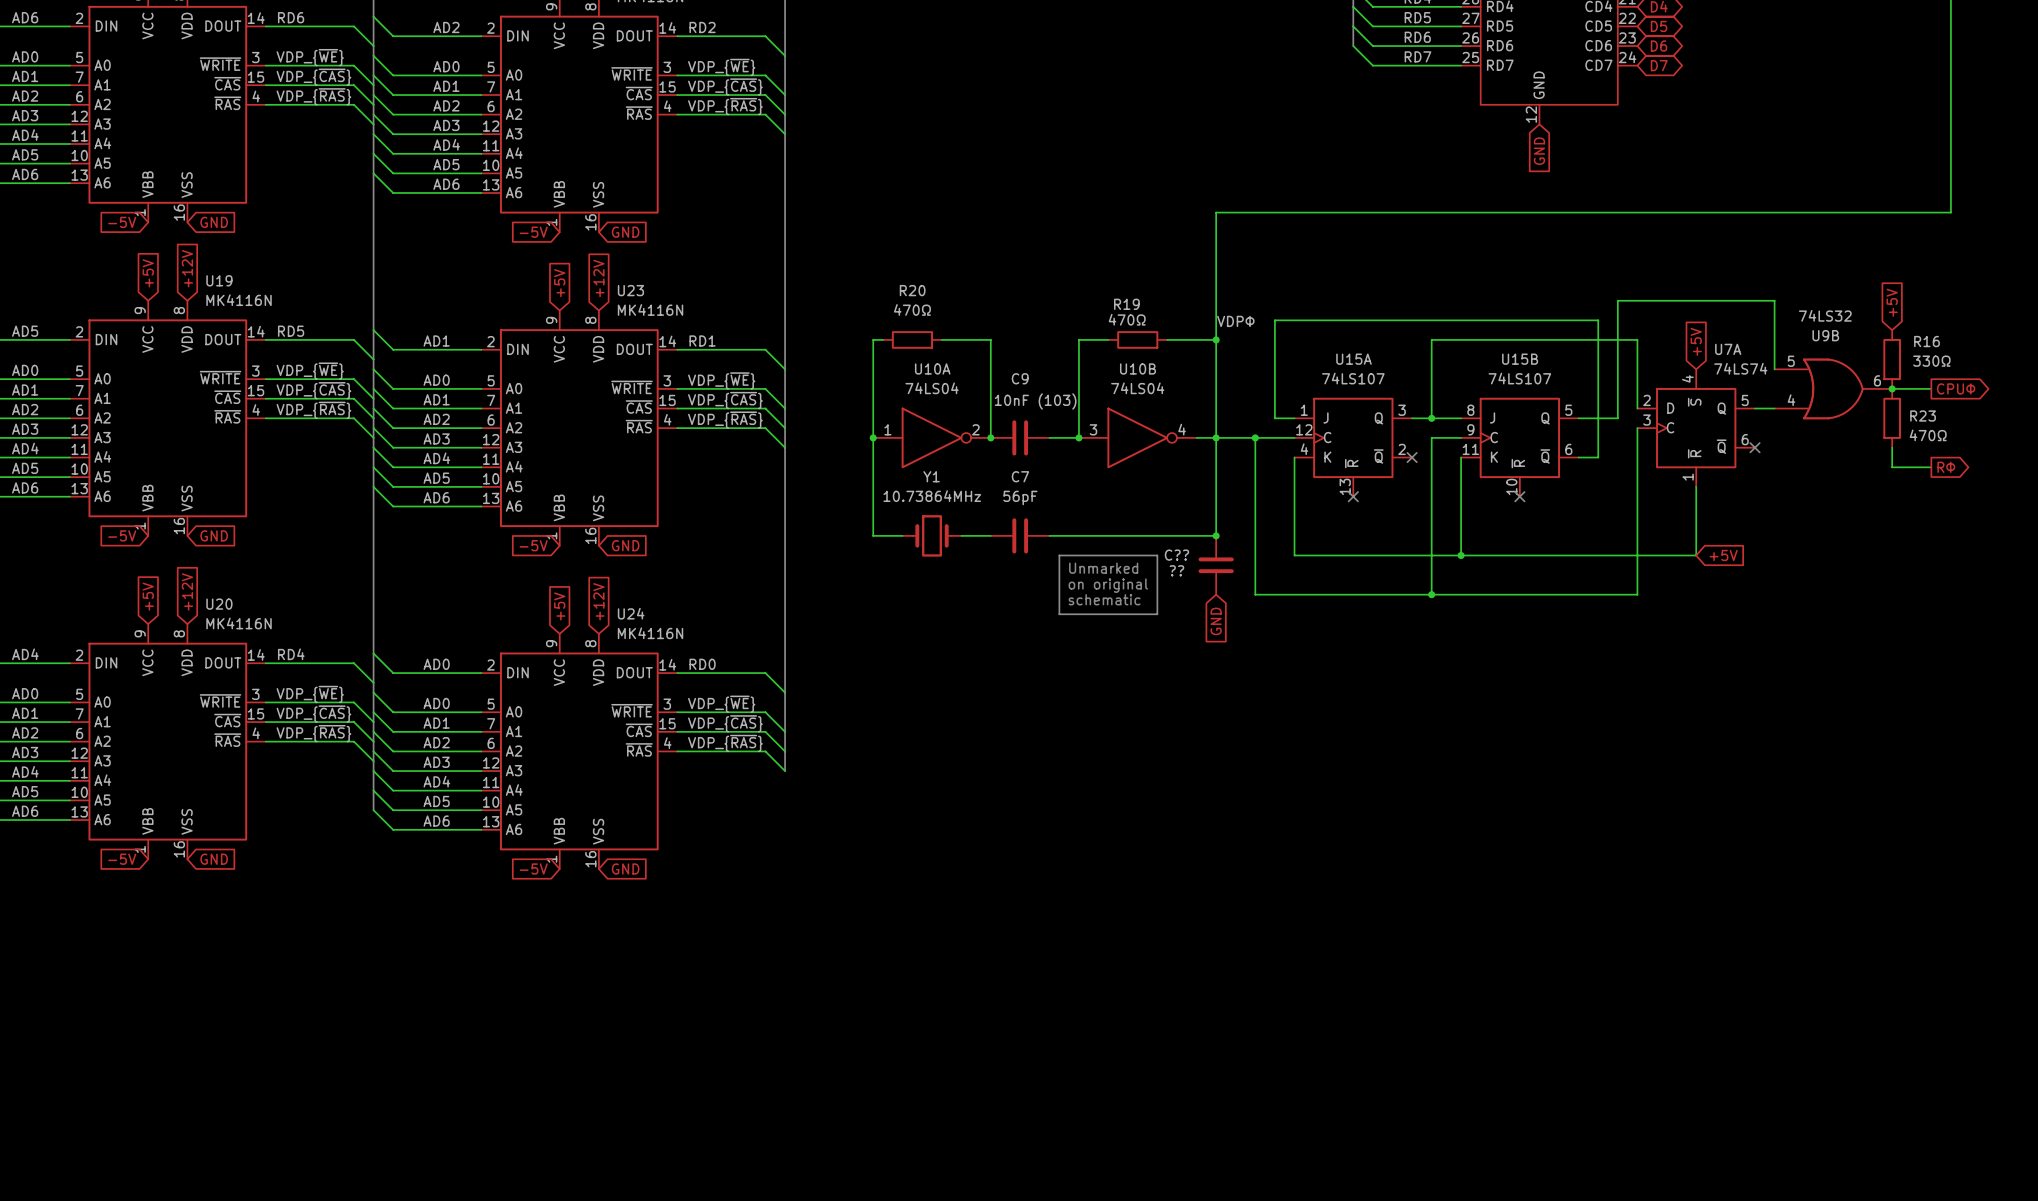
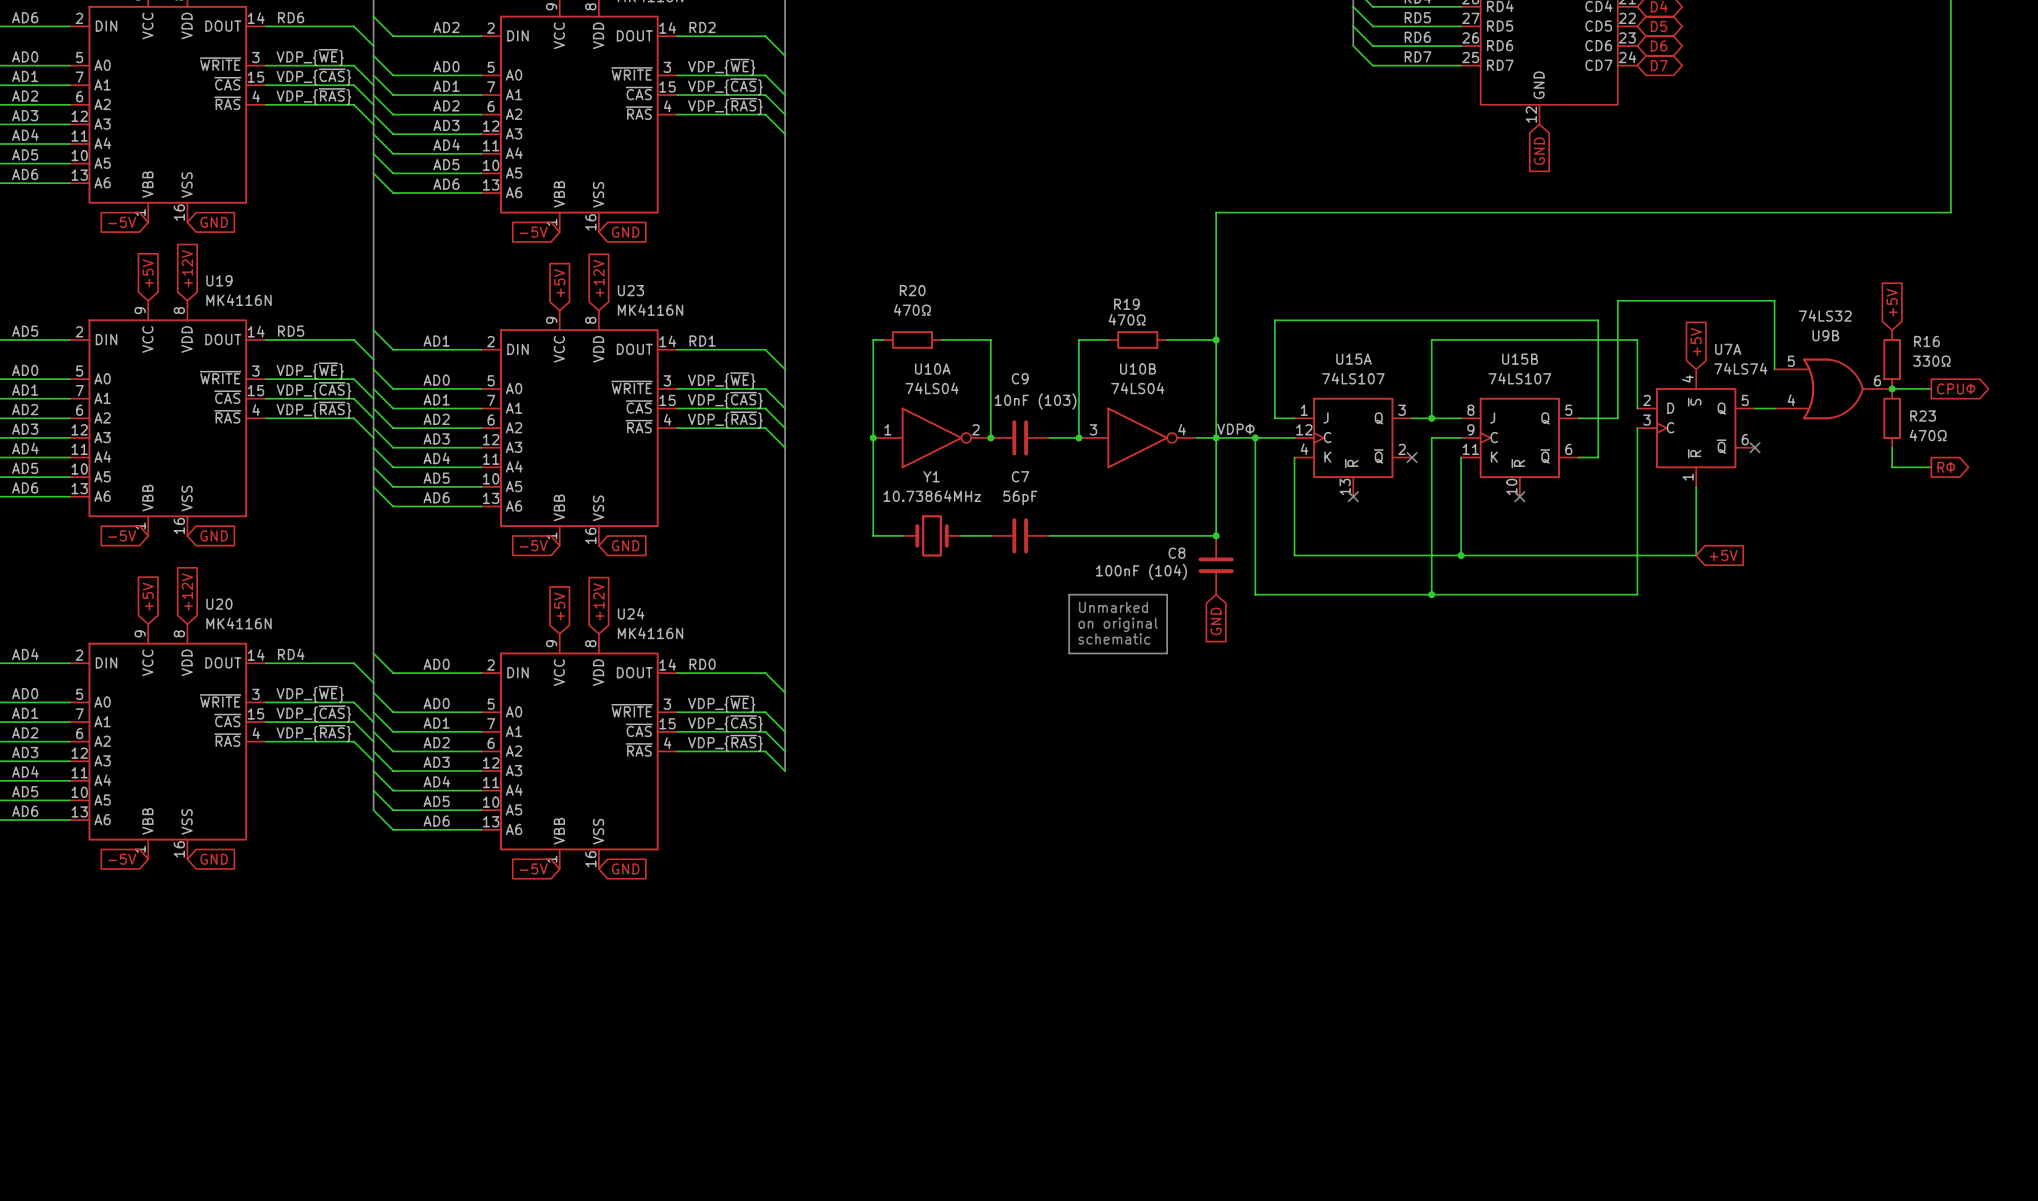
label position: VDPΦ (1235, 321) -> VDPΦ (1235, 429)
line: (1059, 555) (1157, 555) (1157, 614) (1059, 614) (1059, 555) -> (1069, 594) (1167, 594) (1167, 653) (1069, 653) (1069, 594)
C?? name: C?? (1176, 555) -> C8 (1176, 553)
text position: Unmarked (1103, 568) -> Unmarked (1113, 607)
C?? value: ?? (1176, 570) -> 100nF (104) (1141, 571)
text position: on original (1108, 585) -> on original (1118, 624)
text position: schematic (1104, 599) -> schematic (1114, 638)

